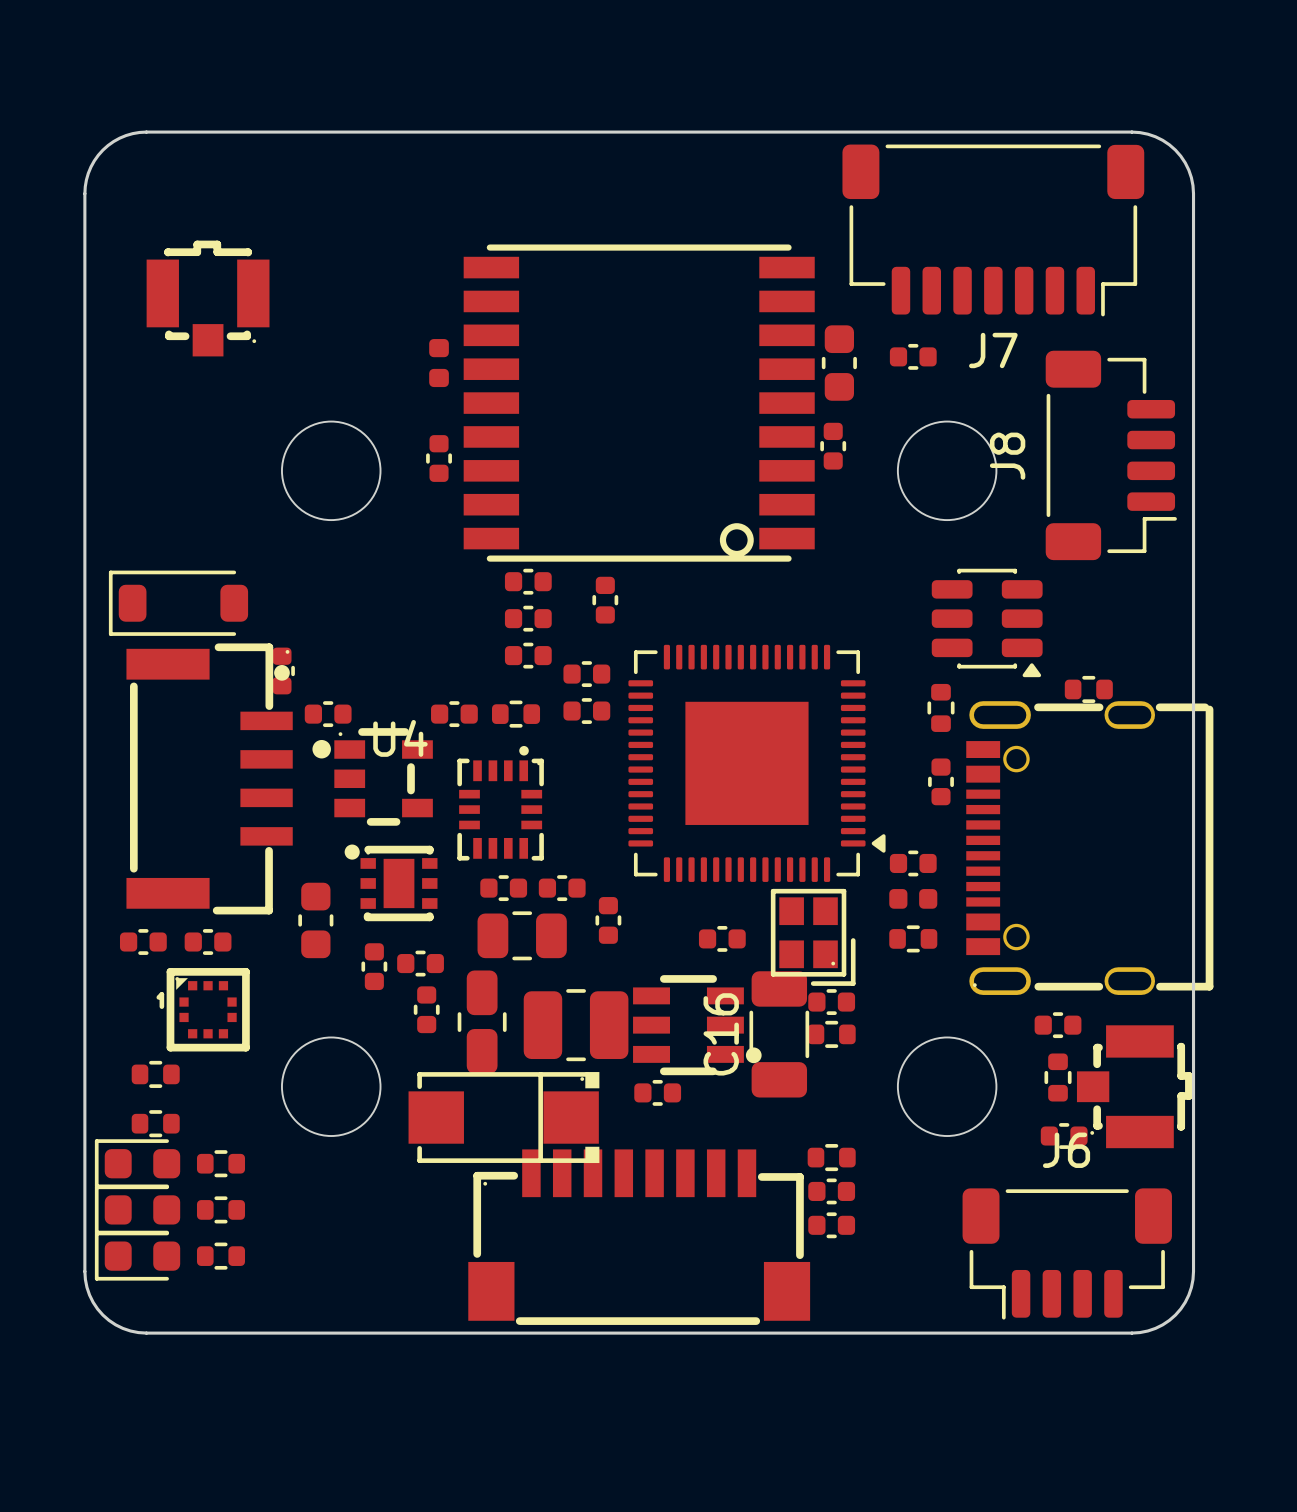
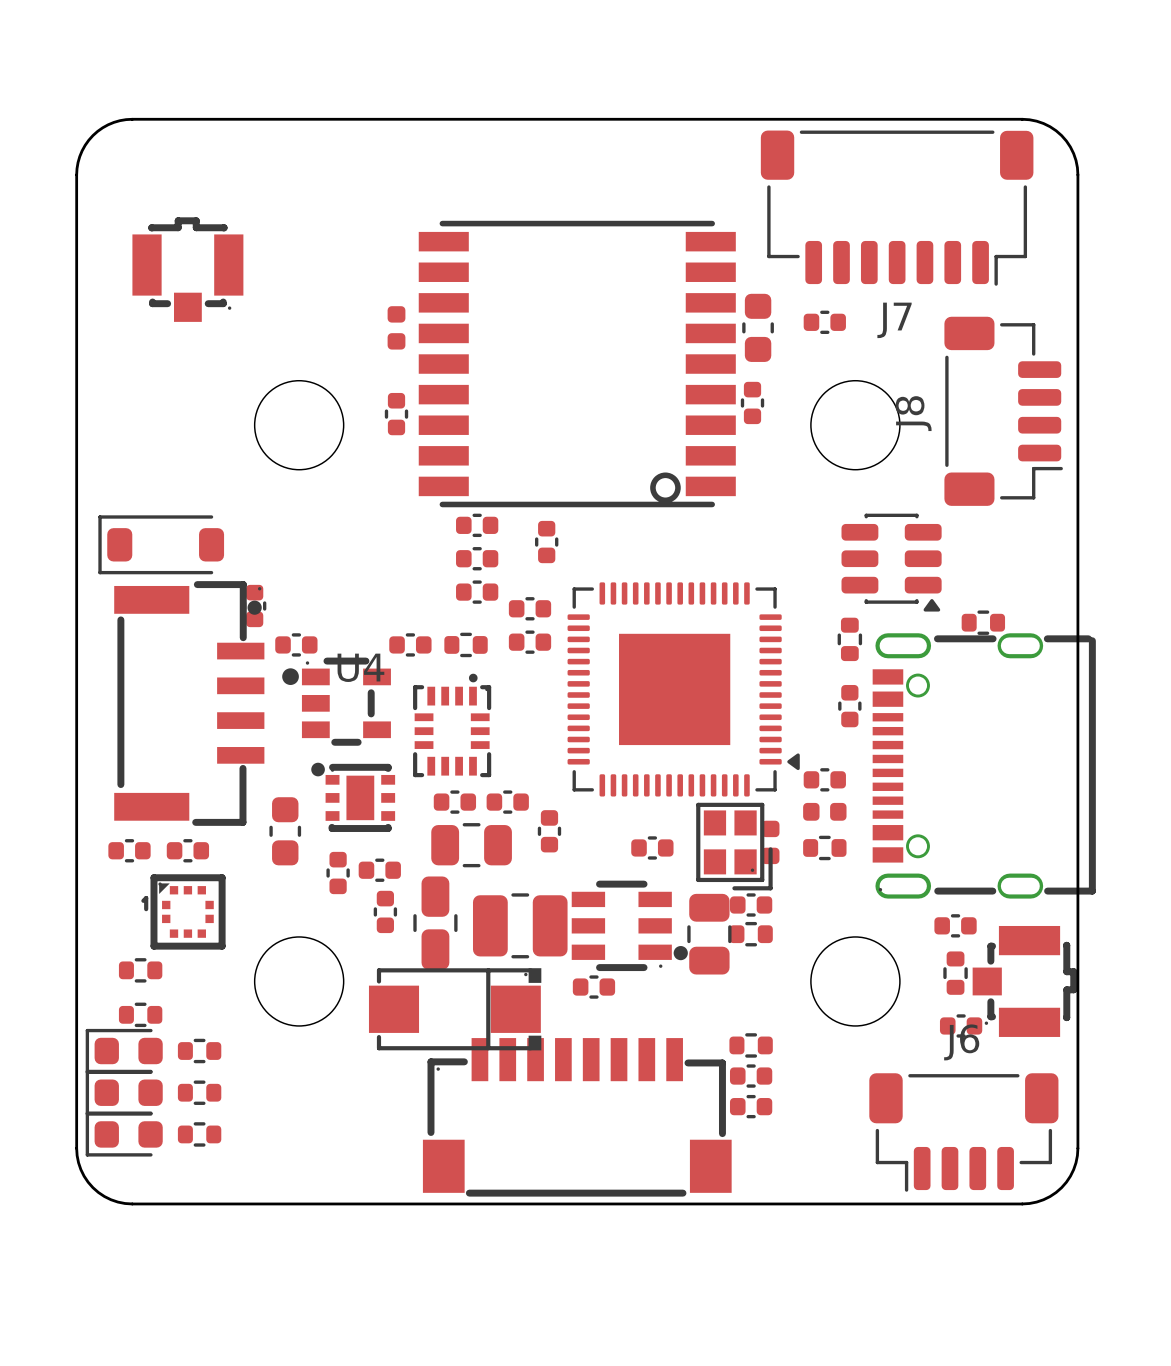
part: none -> (770, 842)
C16: (779, 1034) -> none
part: none -> (709, 934)

